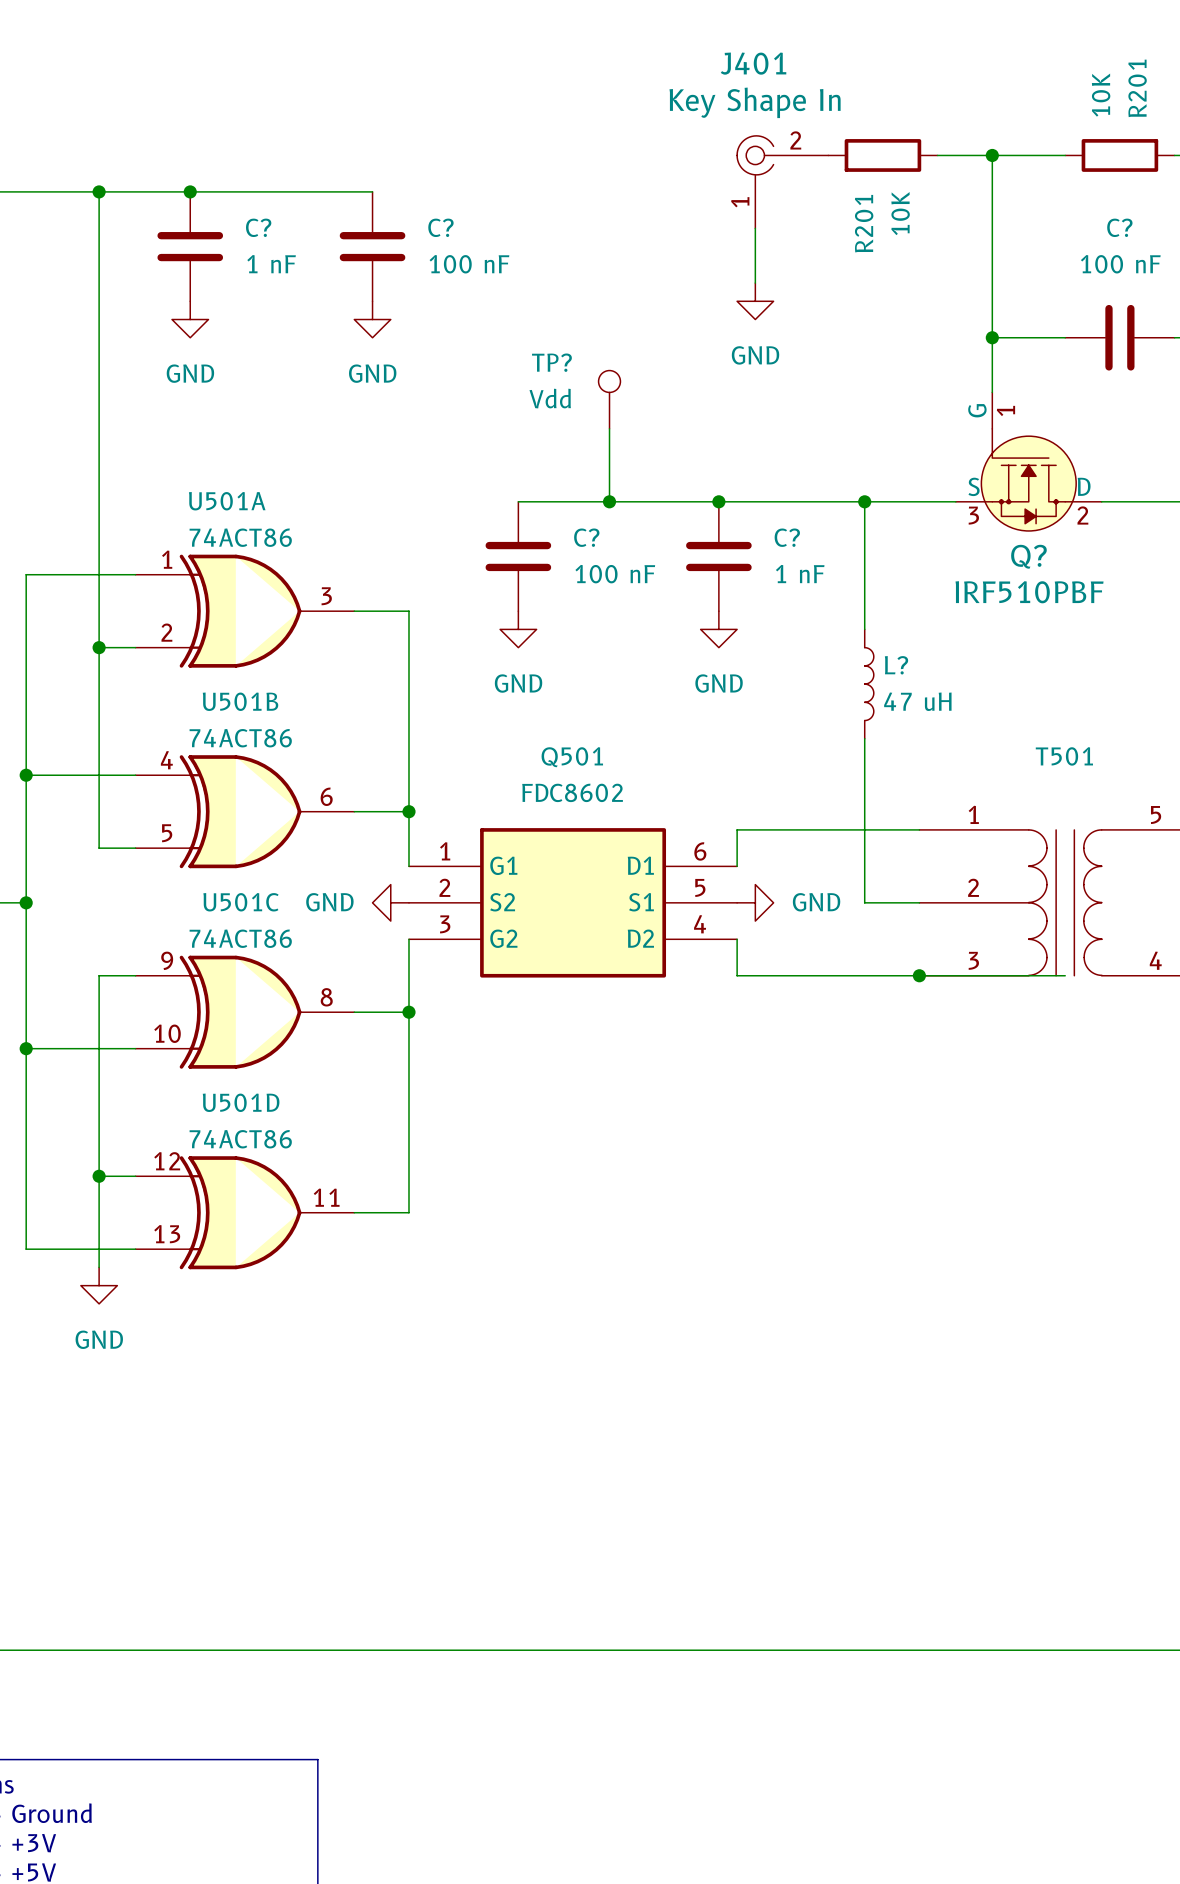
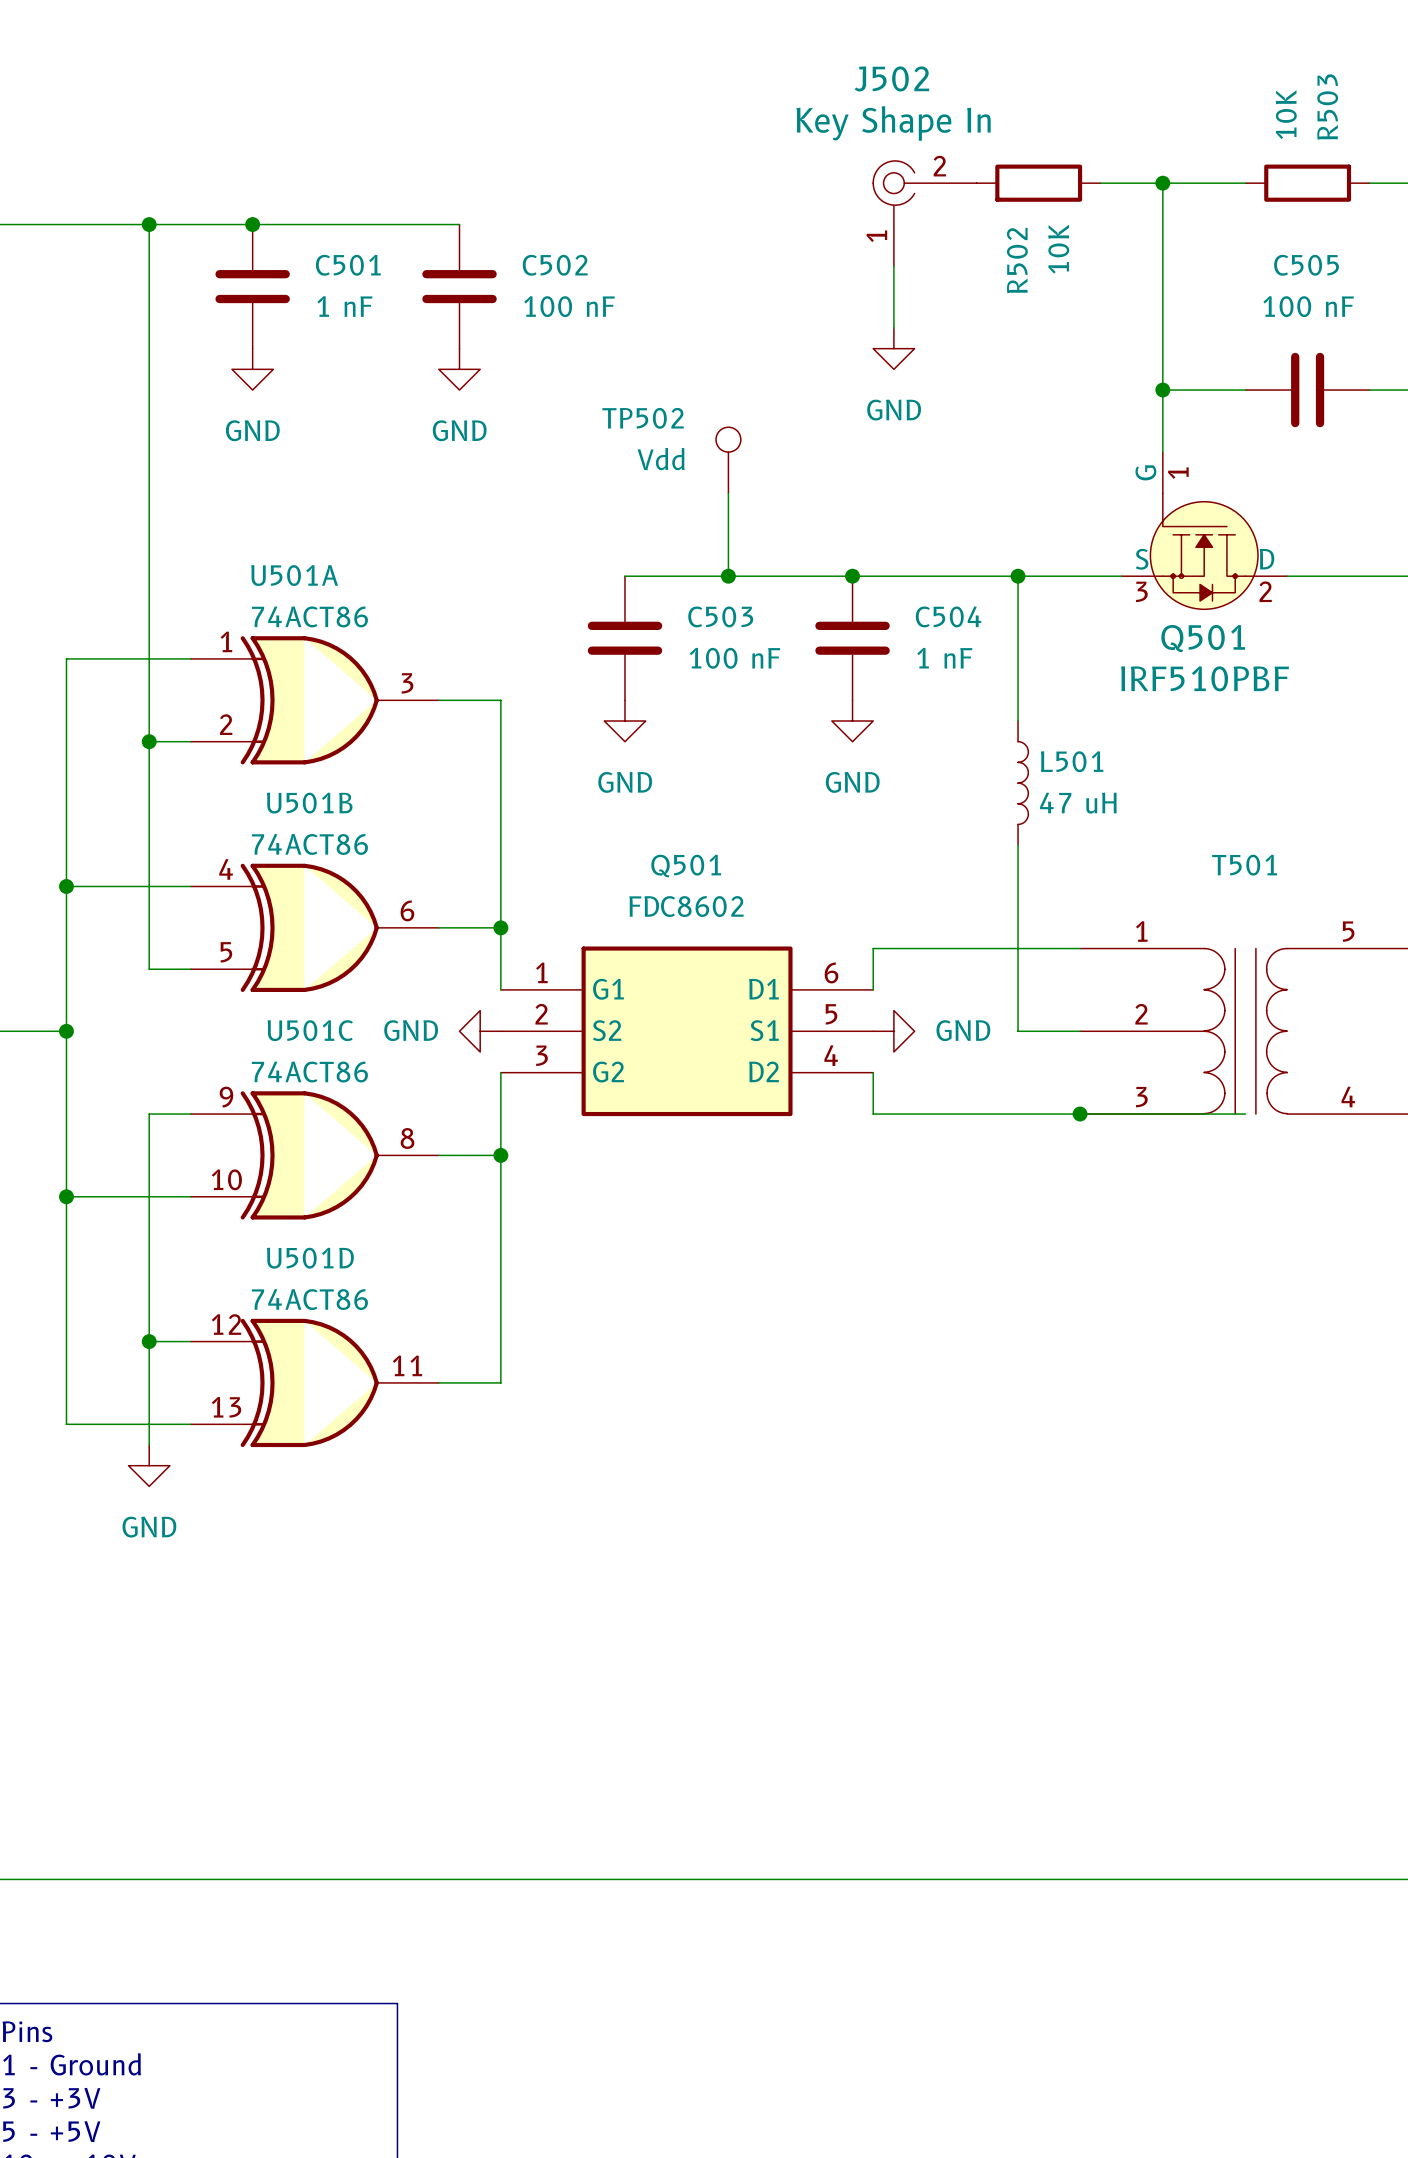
J401 name: J401 (753, 63) -> J502 (891, 78)
R201 name: R201 (1137, 88) -> R503 (1327, 107)
R201 name: R201 (864, 223) -> R502 (1017, 260)
C? name: C? (258, 227) -> C501 (348, 265)
C? name: C? (440, 227) -> C502 (555, 265)
C? name: C? (1119, 227) -> C505 (1306, 265)
TP? name: TP? (551, 362) -> TP502 (643, 418)
C? name: C? (586, 537) -> C503 (720, 616)
C? name: C? (787, 537) -> C504 (948, 616)
Q? name: Q? (1028, 556) -> Q501 (1203, 638)
L? name: L? (896, 665) -> L501 (1072, 761)

